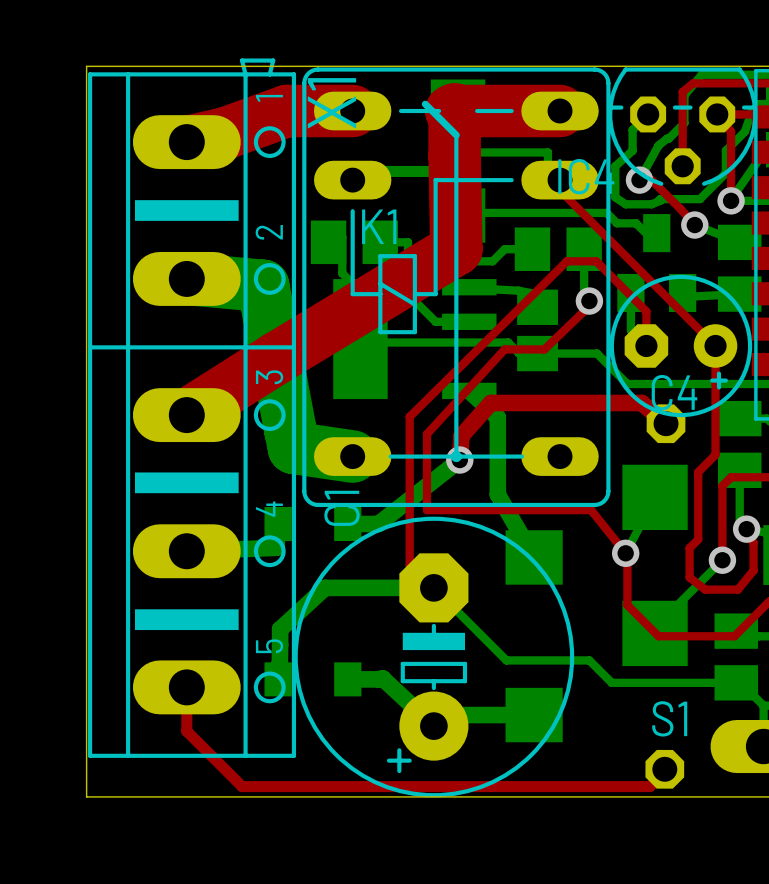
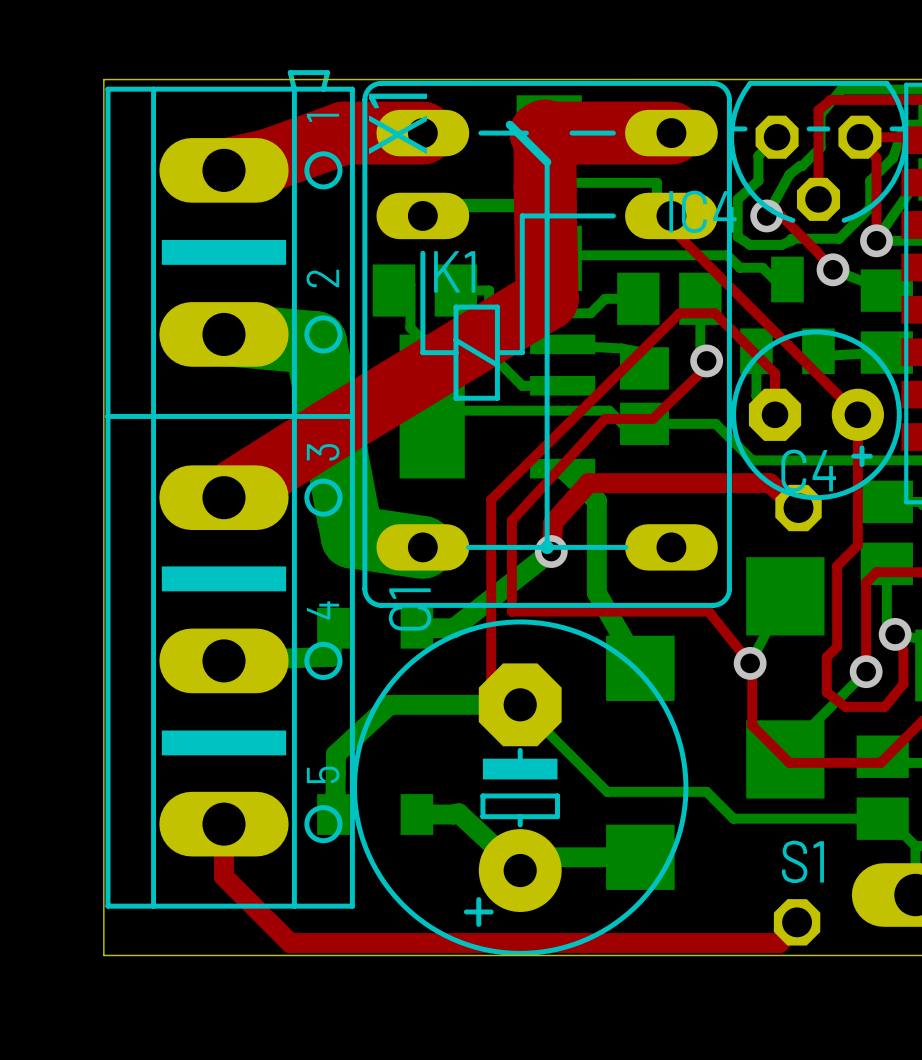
top track width: thin (186, 687) (186, 731) (242, 786) (649, 786) (664, 771) -> thick (223, 824) (223, 876) (290, 943) (779, 943) (797, 925)

